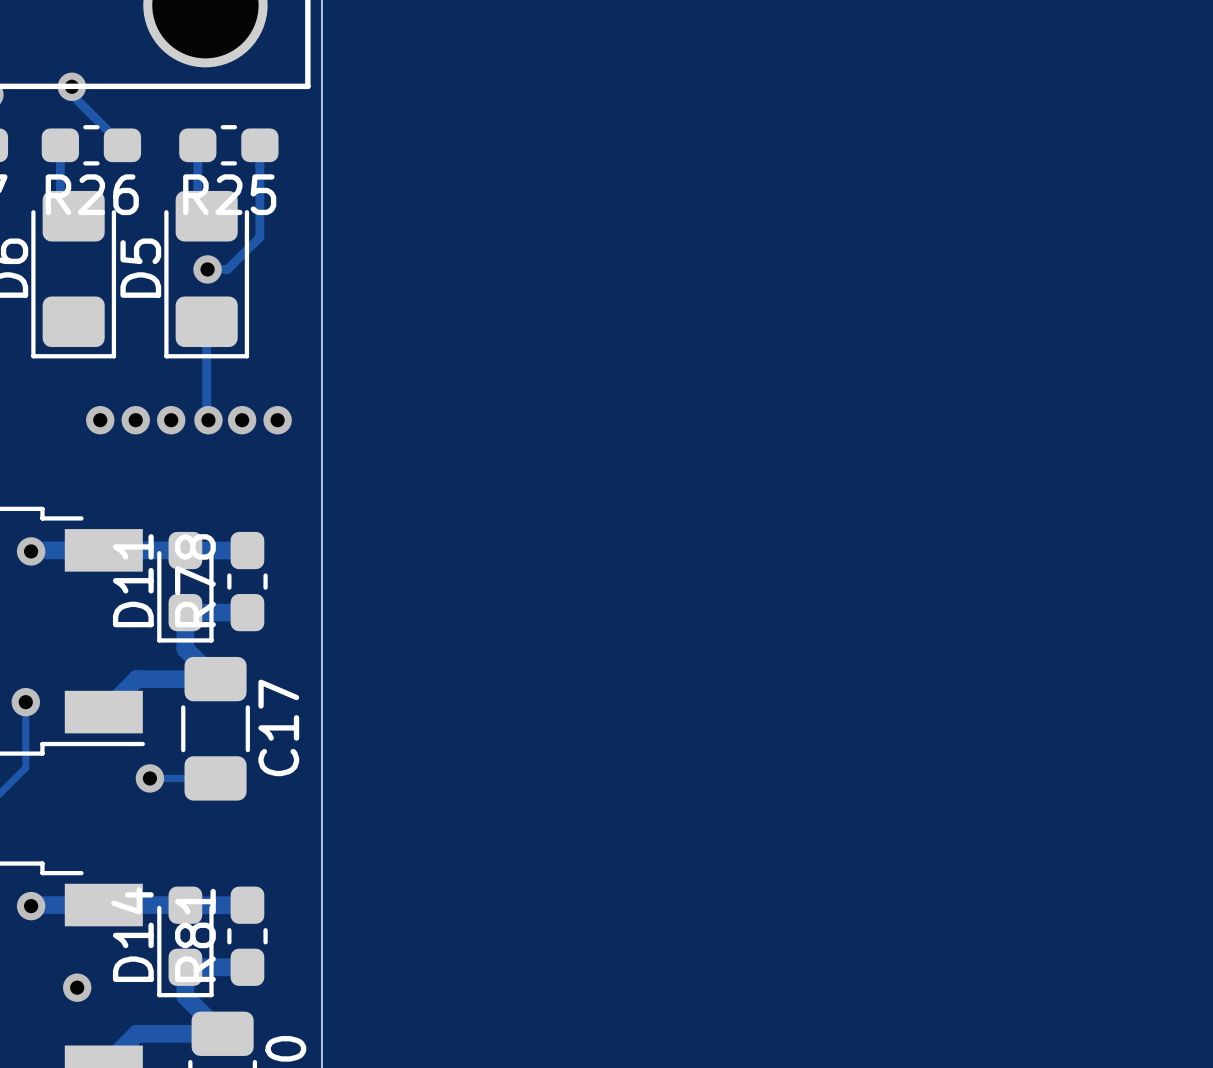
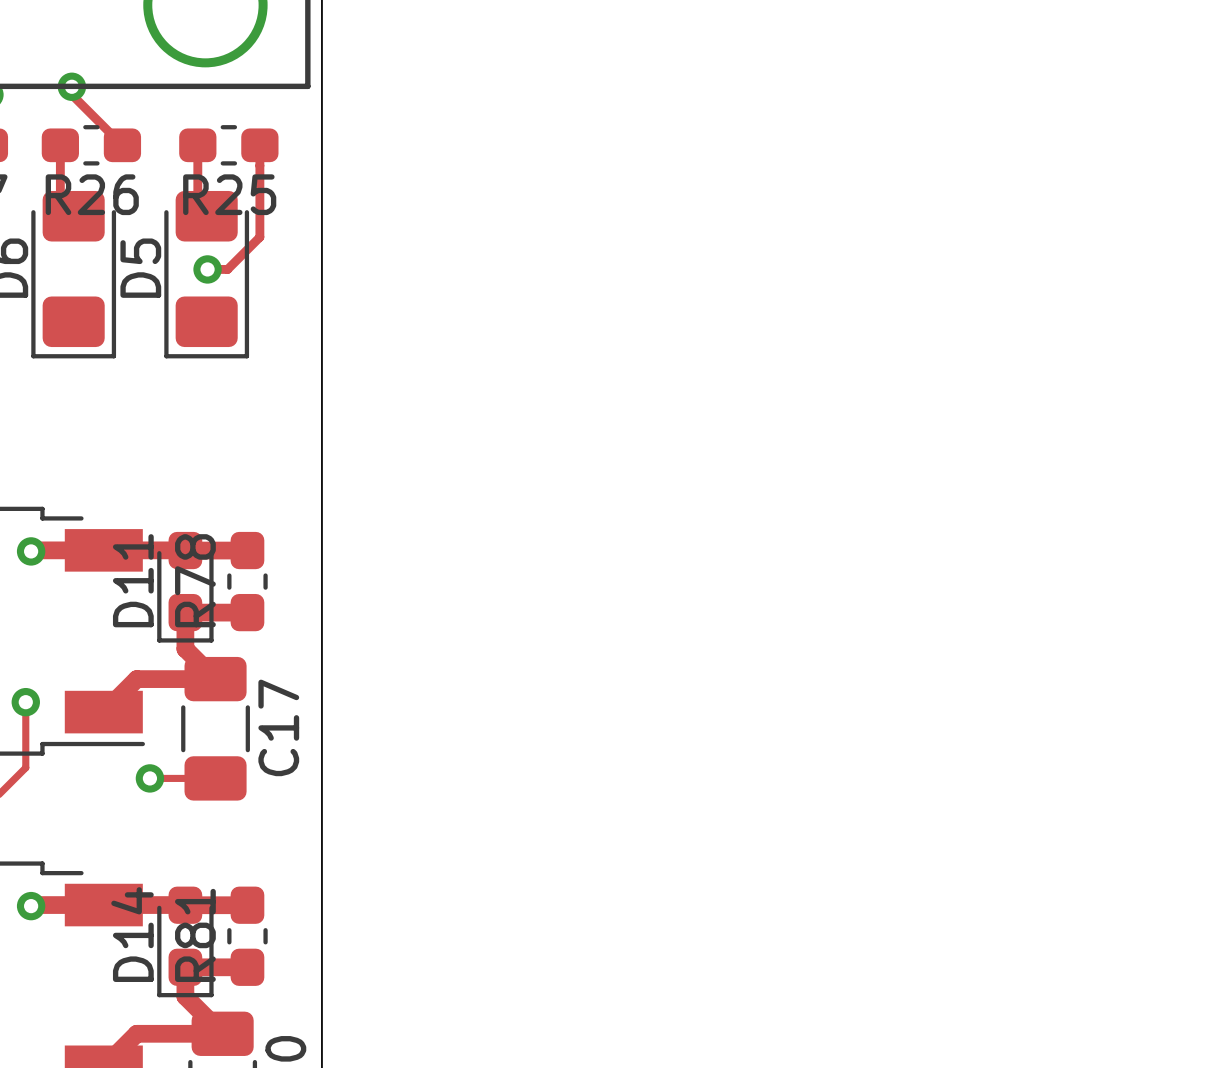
track: (206, 321) (206, 418) (208, 420) -> none
via: (100, 420) -> none
via: (135, 420) -> none
via: (171, 420) -> none
via: (208, 420) -> none
via: (242, 420) -> none
via: (277, 420) -> none
via: (77, 987) -> none

